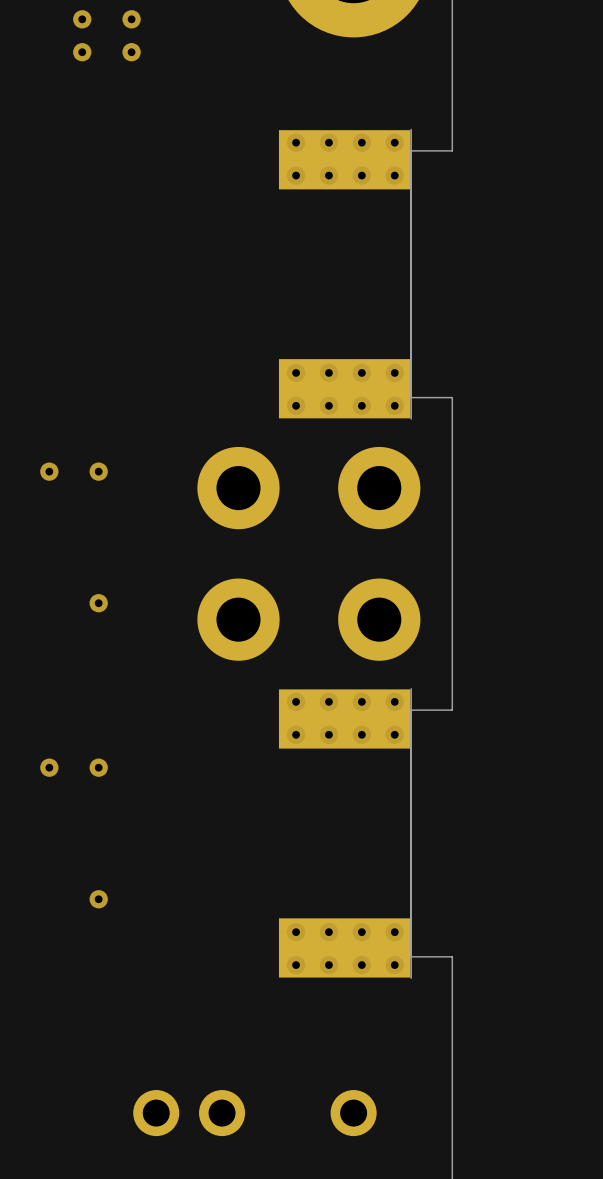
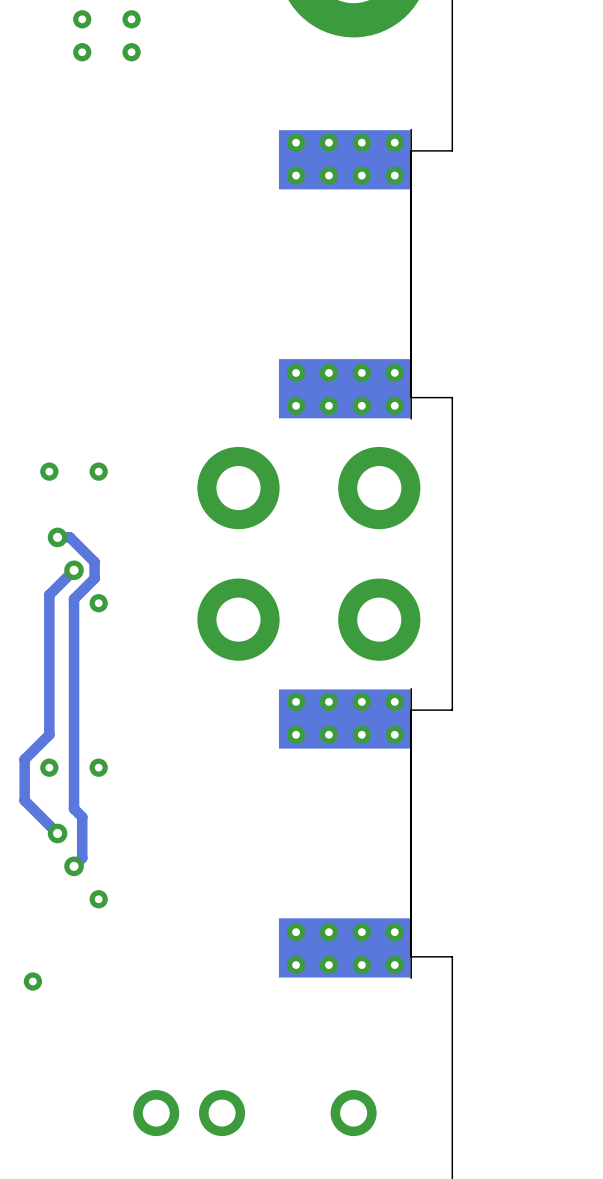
track: none -> (57, 537) (69, 537) (94, 562) (94, 578) (74, 599) (74, 808) (82, 817) (82, 858) (74, 866)
via: none -> (57, 537)
track: none -> (74, 570) (49, 594) (49, 734) (24, 759) (24, 800) (57, 833)
via: none -> (74, 570)
via: none -> (57, 833)
via: none -> (74, 866)
via: none -> (32, 981)

